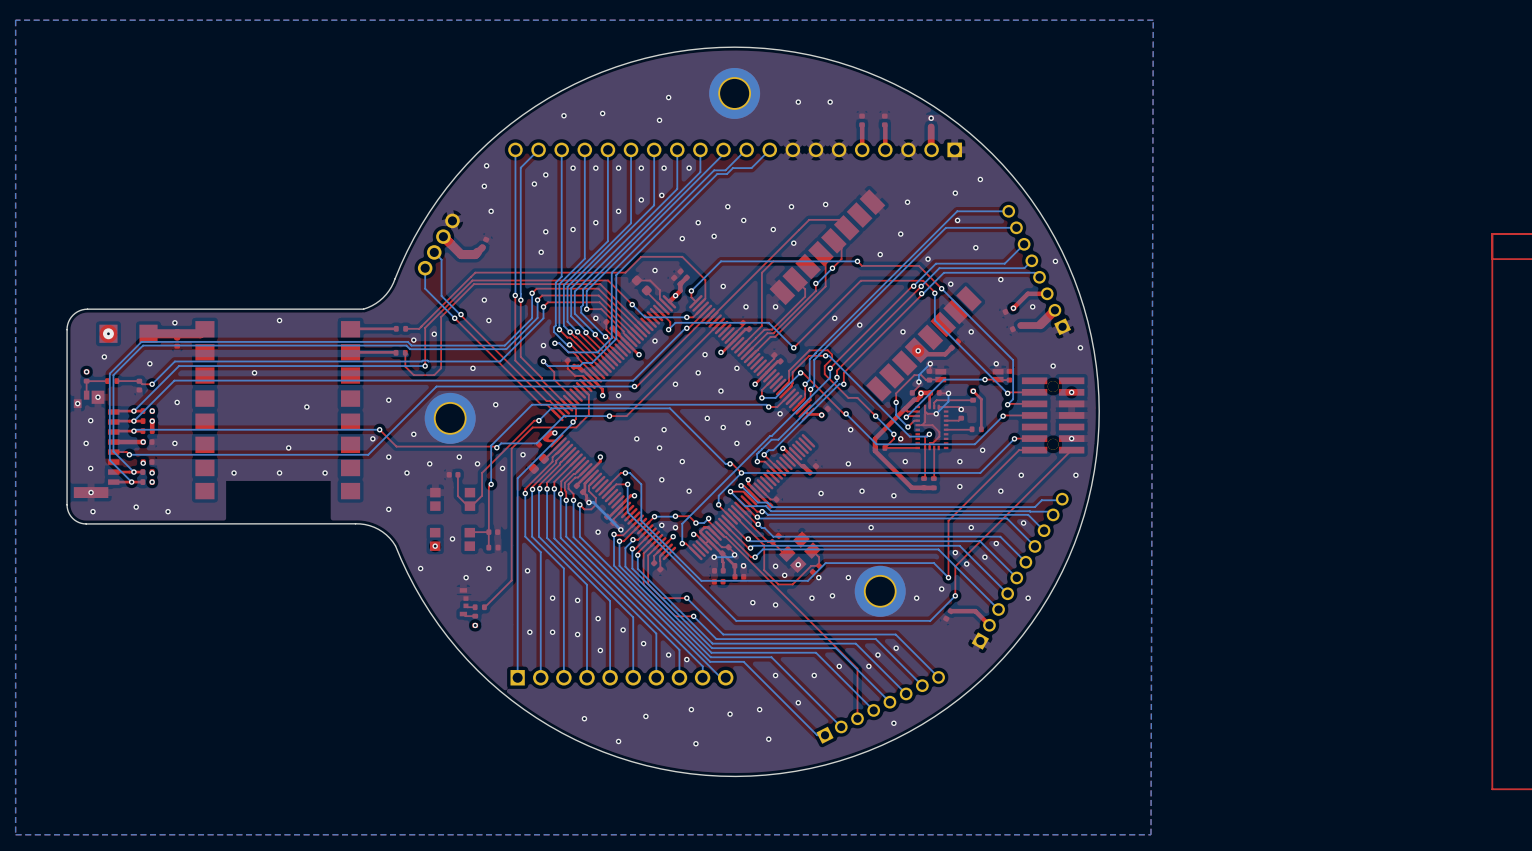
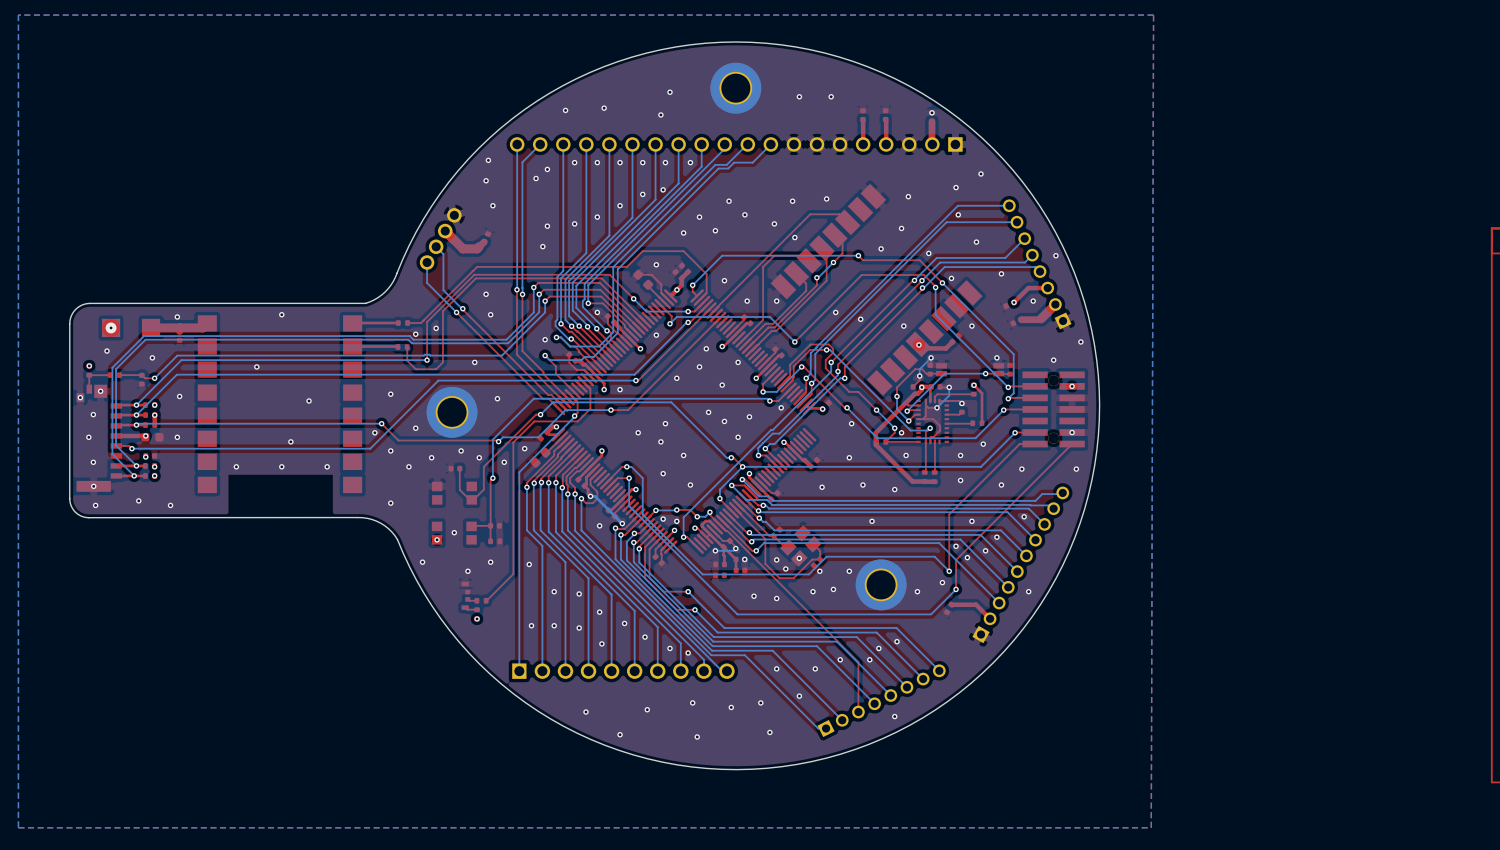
part footprint: [140, 439, 155, 445] -> [141, 433, 164, 442]

